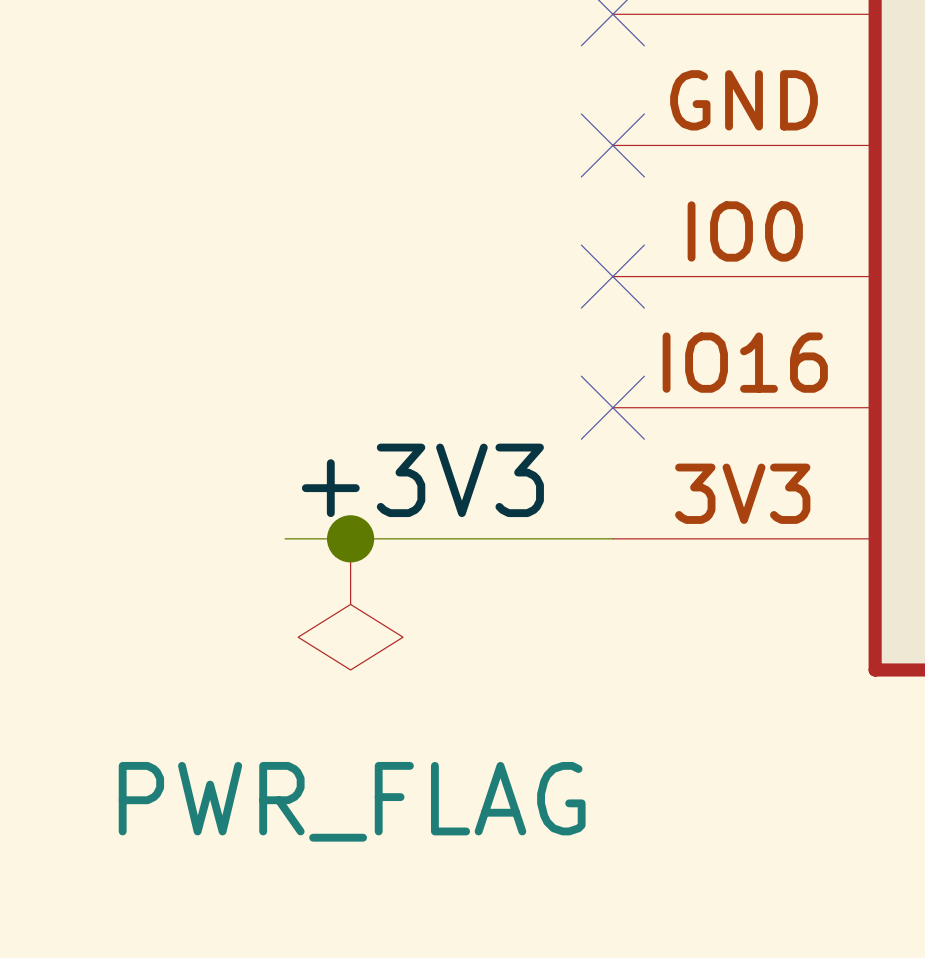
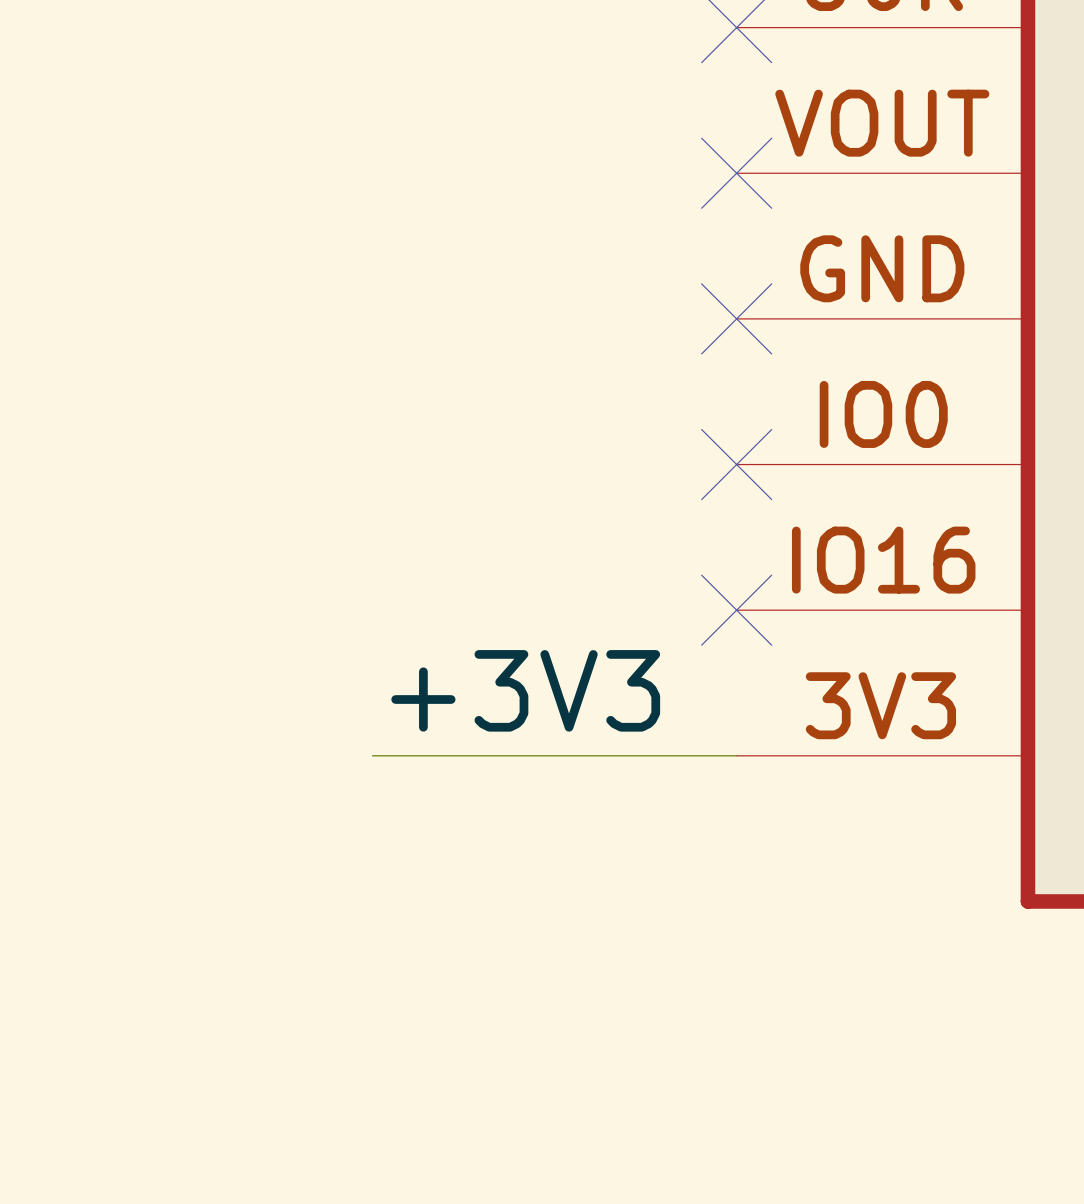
junction: (350, 538) -> none
power symbol: PWR_FLAG (350, 604) -> none

